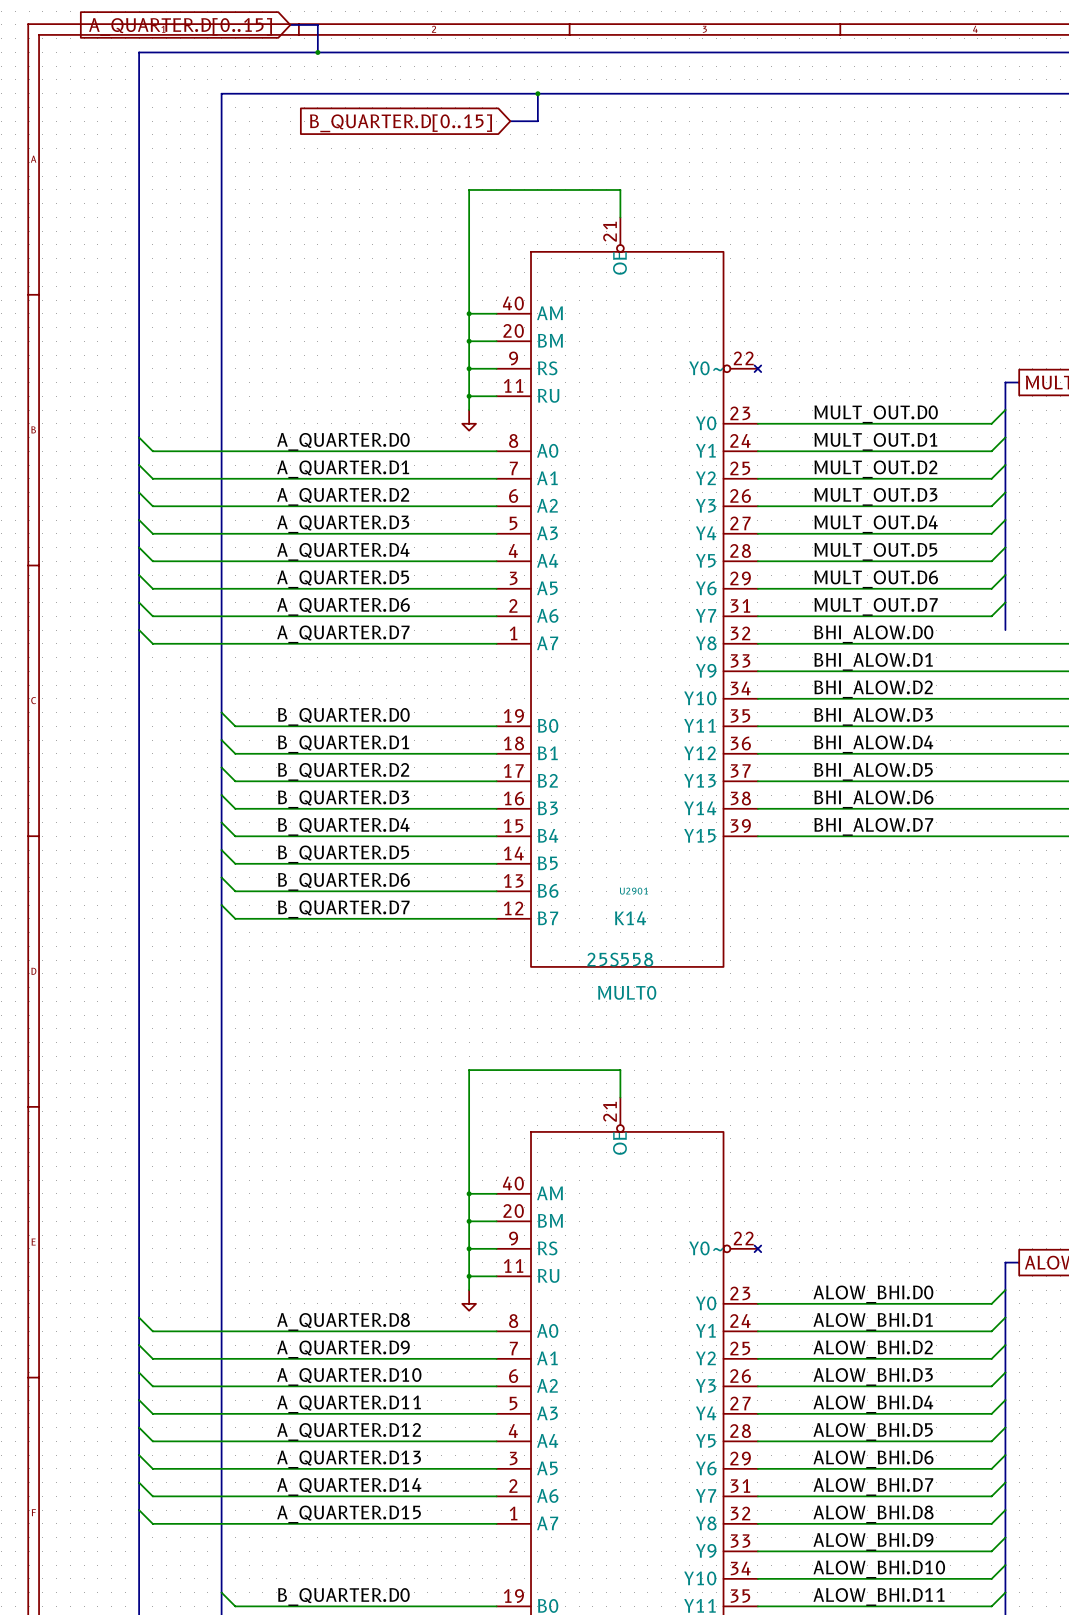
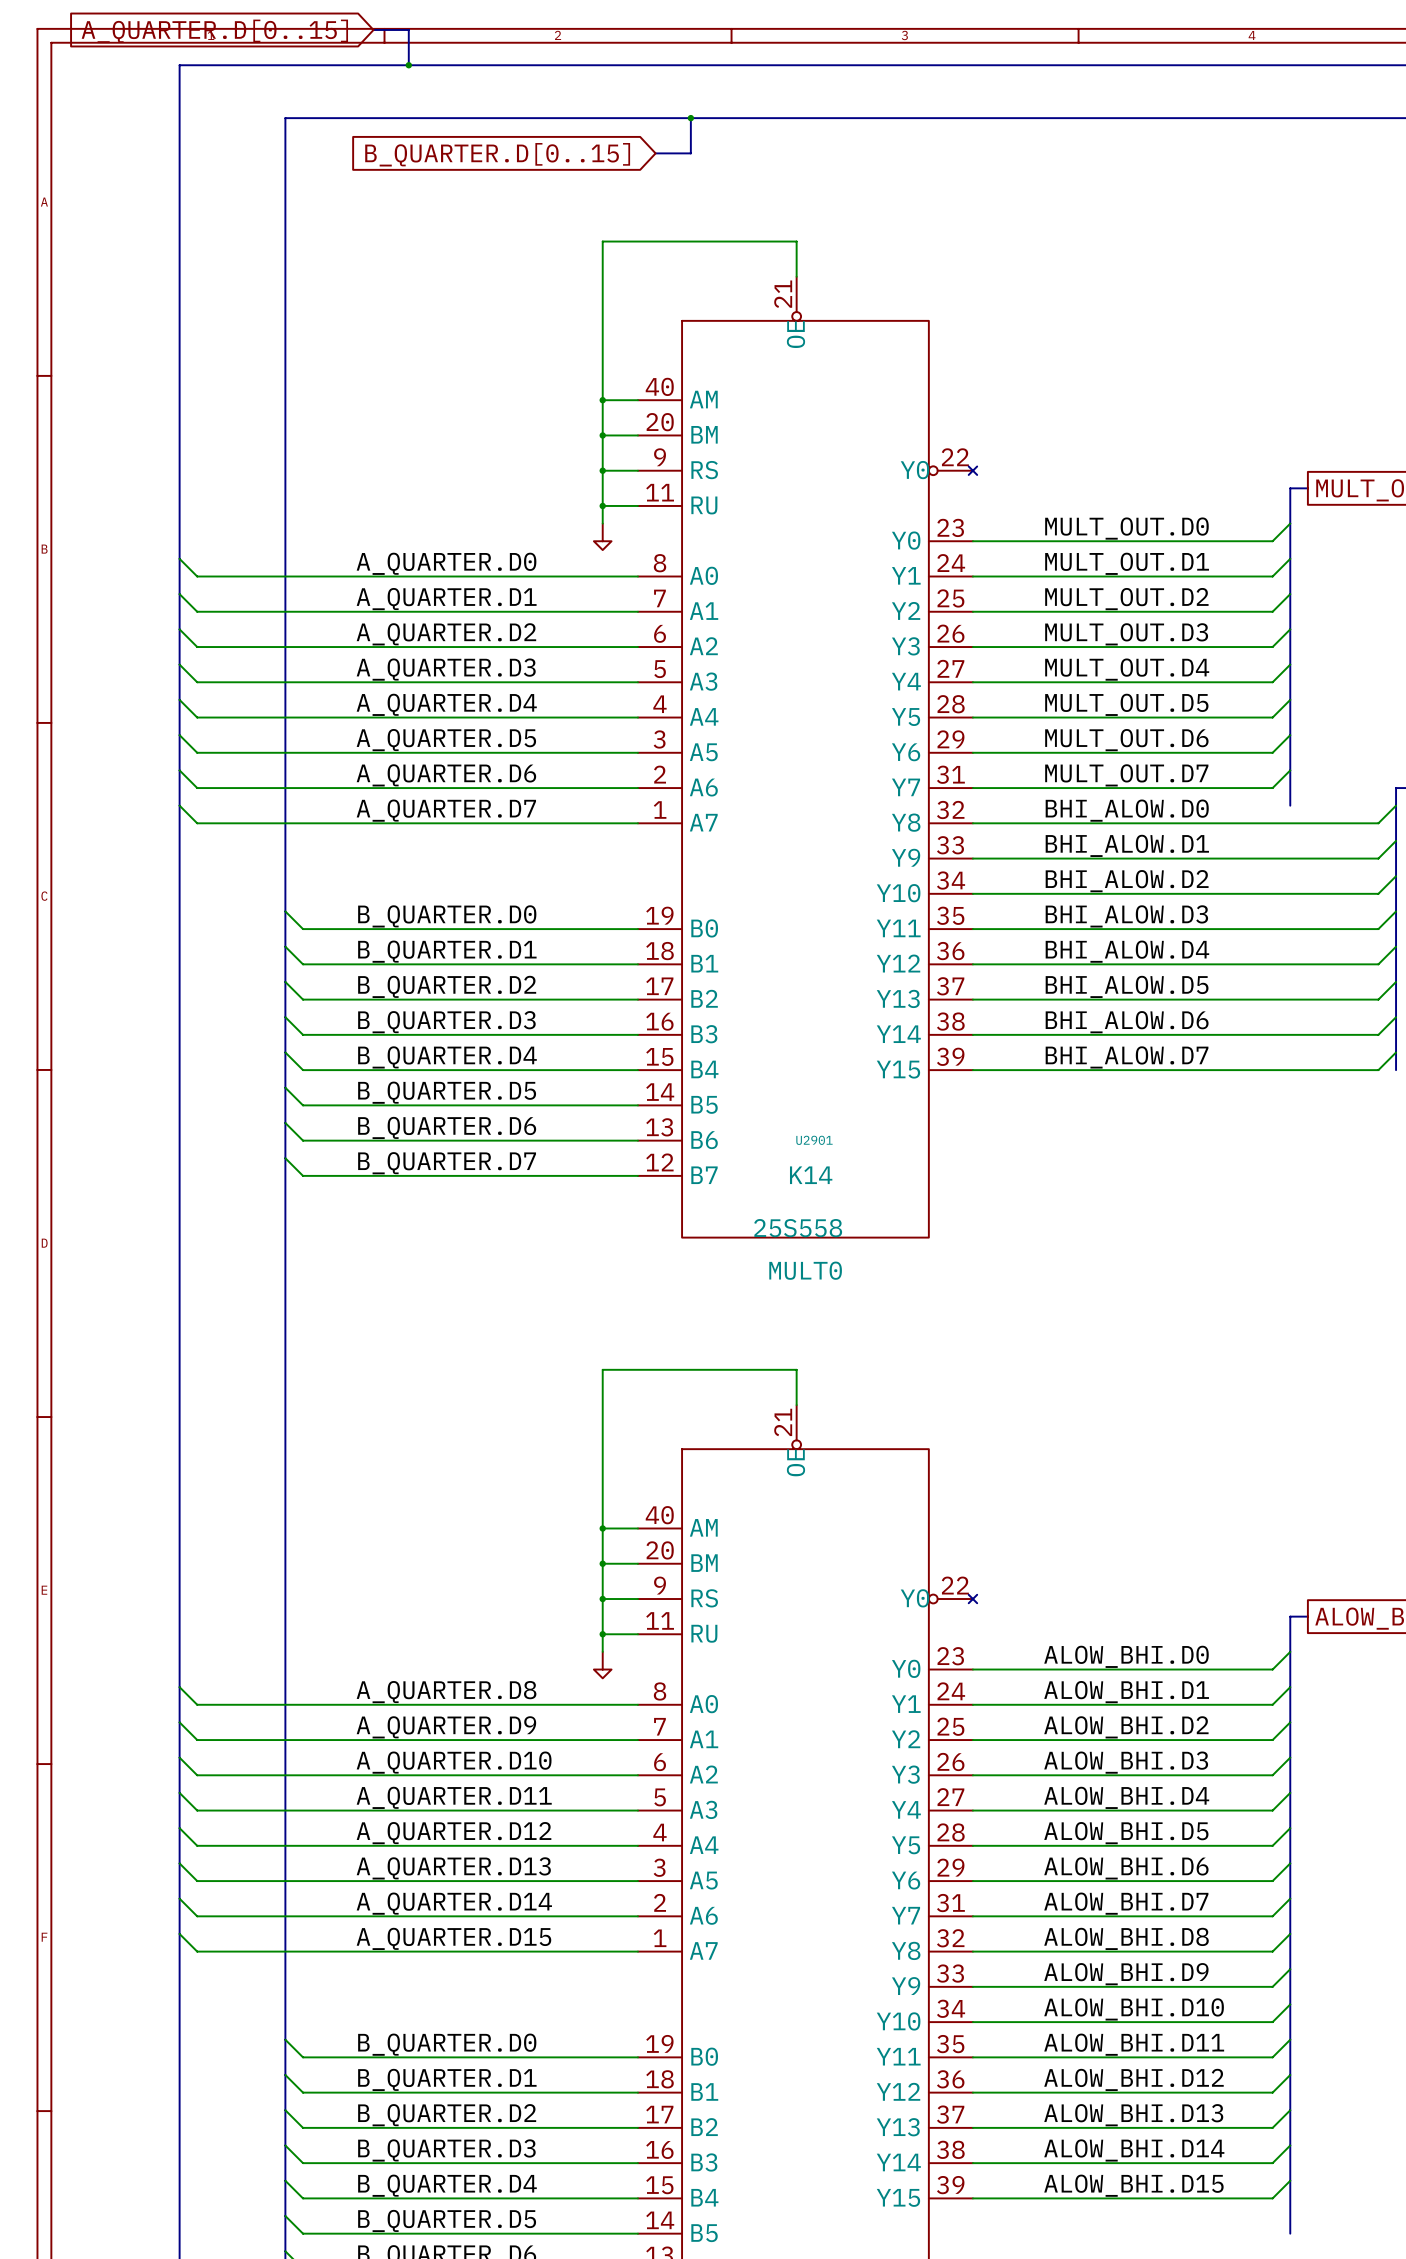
U2901 pin name: Y0~ (706, 368) -> Y0 (914, 470)
part pin name: Y0~ (706, 1248) -> Y0 (914, 1598)

